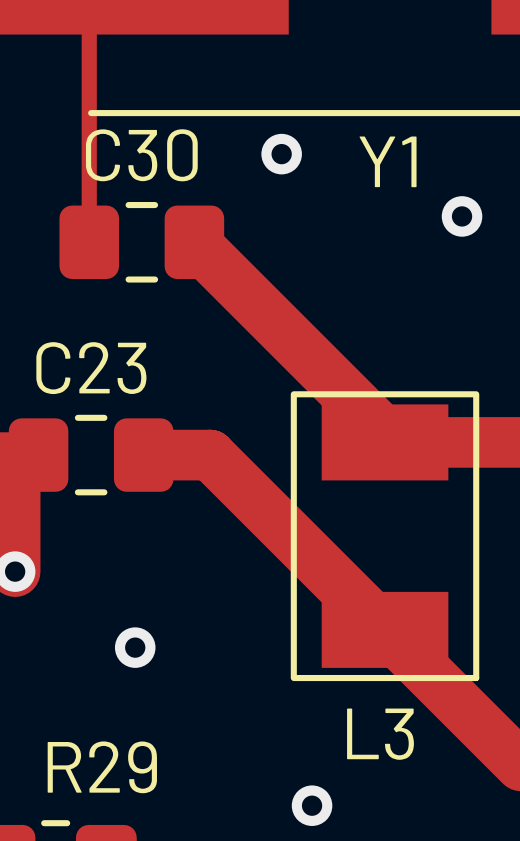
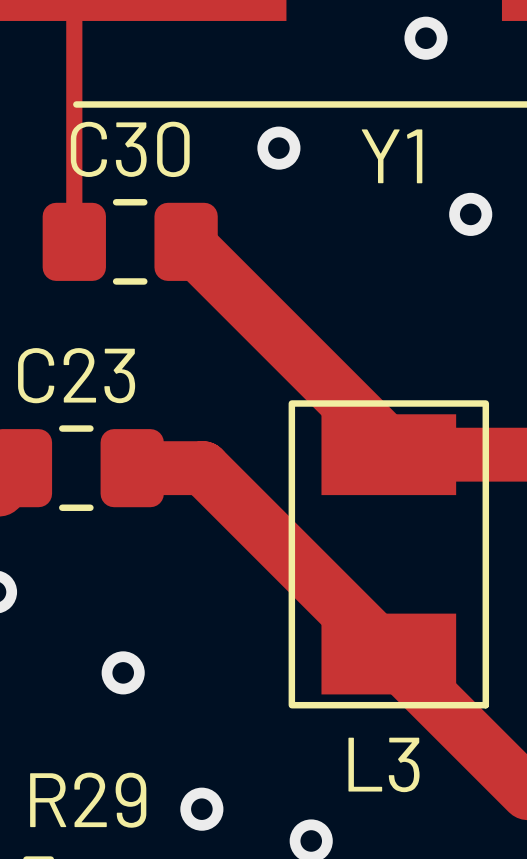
via: none -> (425, 38)
via: none -> (201, 809)

